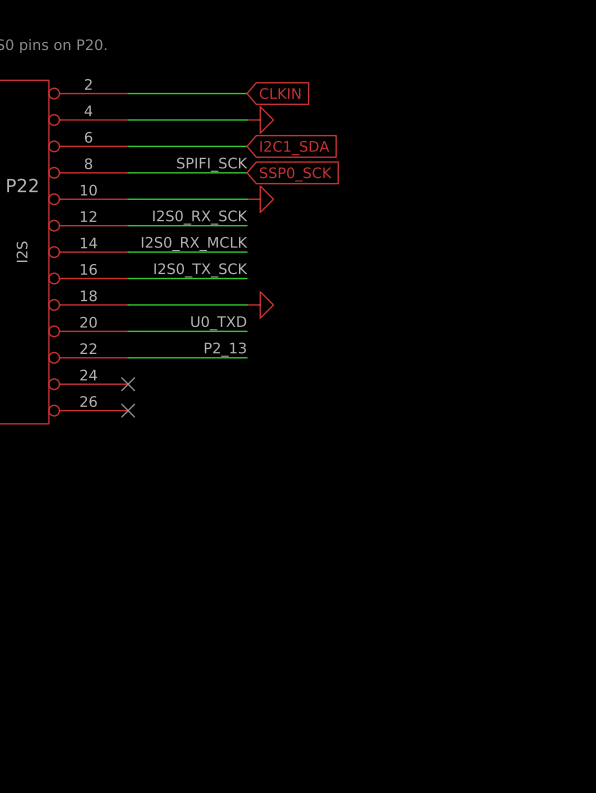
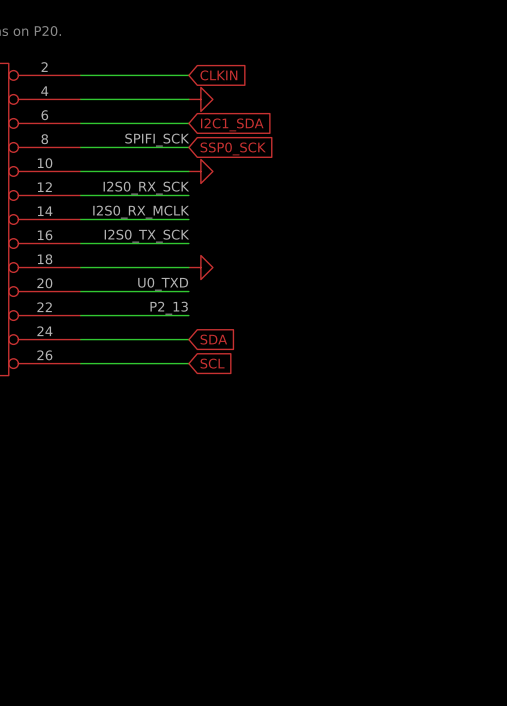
wire: none -> (80, 339) (188, 339)
no-connect mark: (128, 384) -> none
global label: none -> SDA (213, 339)
wire: none -> (80, 363) (188, 363)
no-connect mark: (128, 410) -> none
global label: none -> SCL (212, 363)

